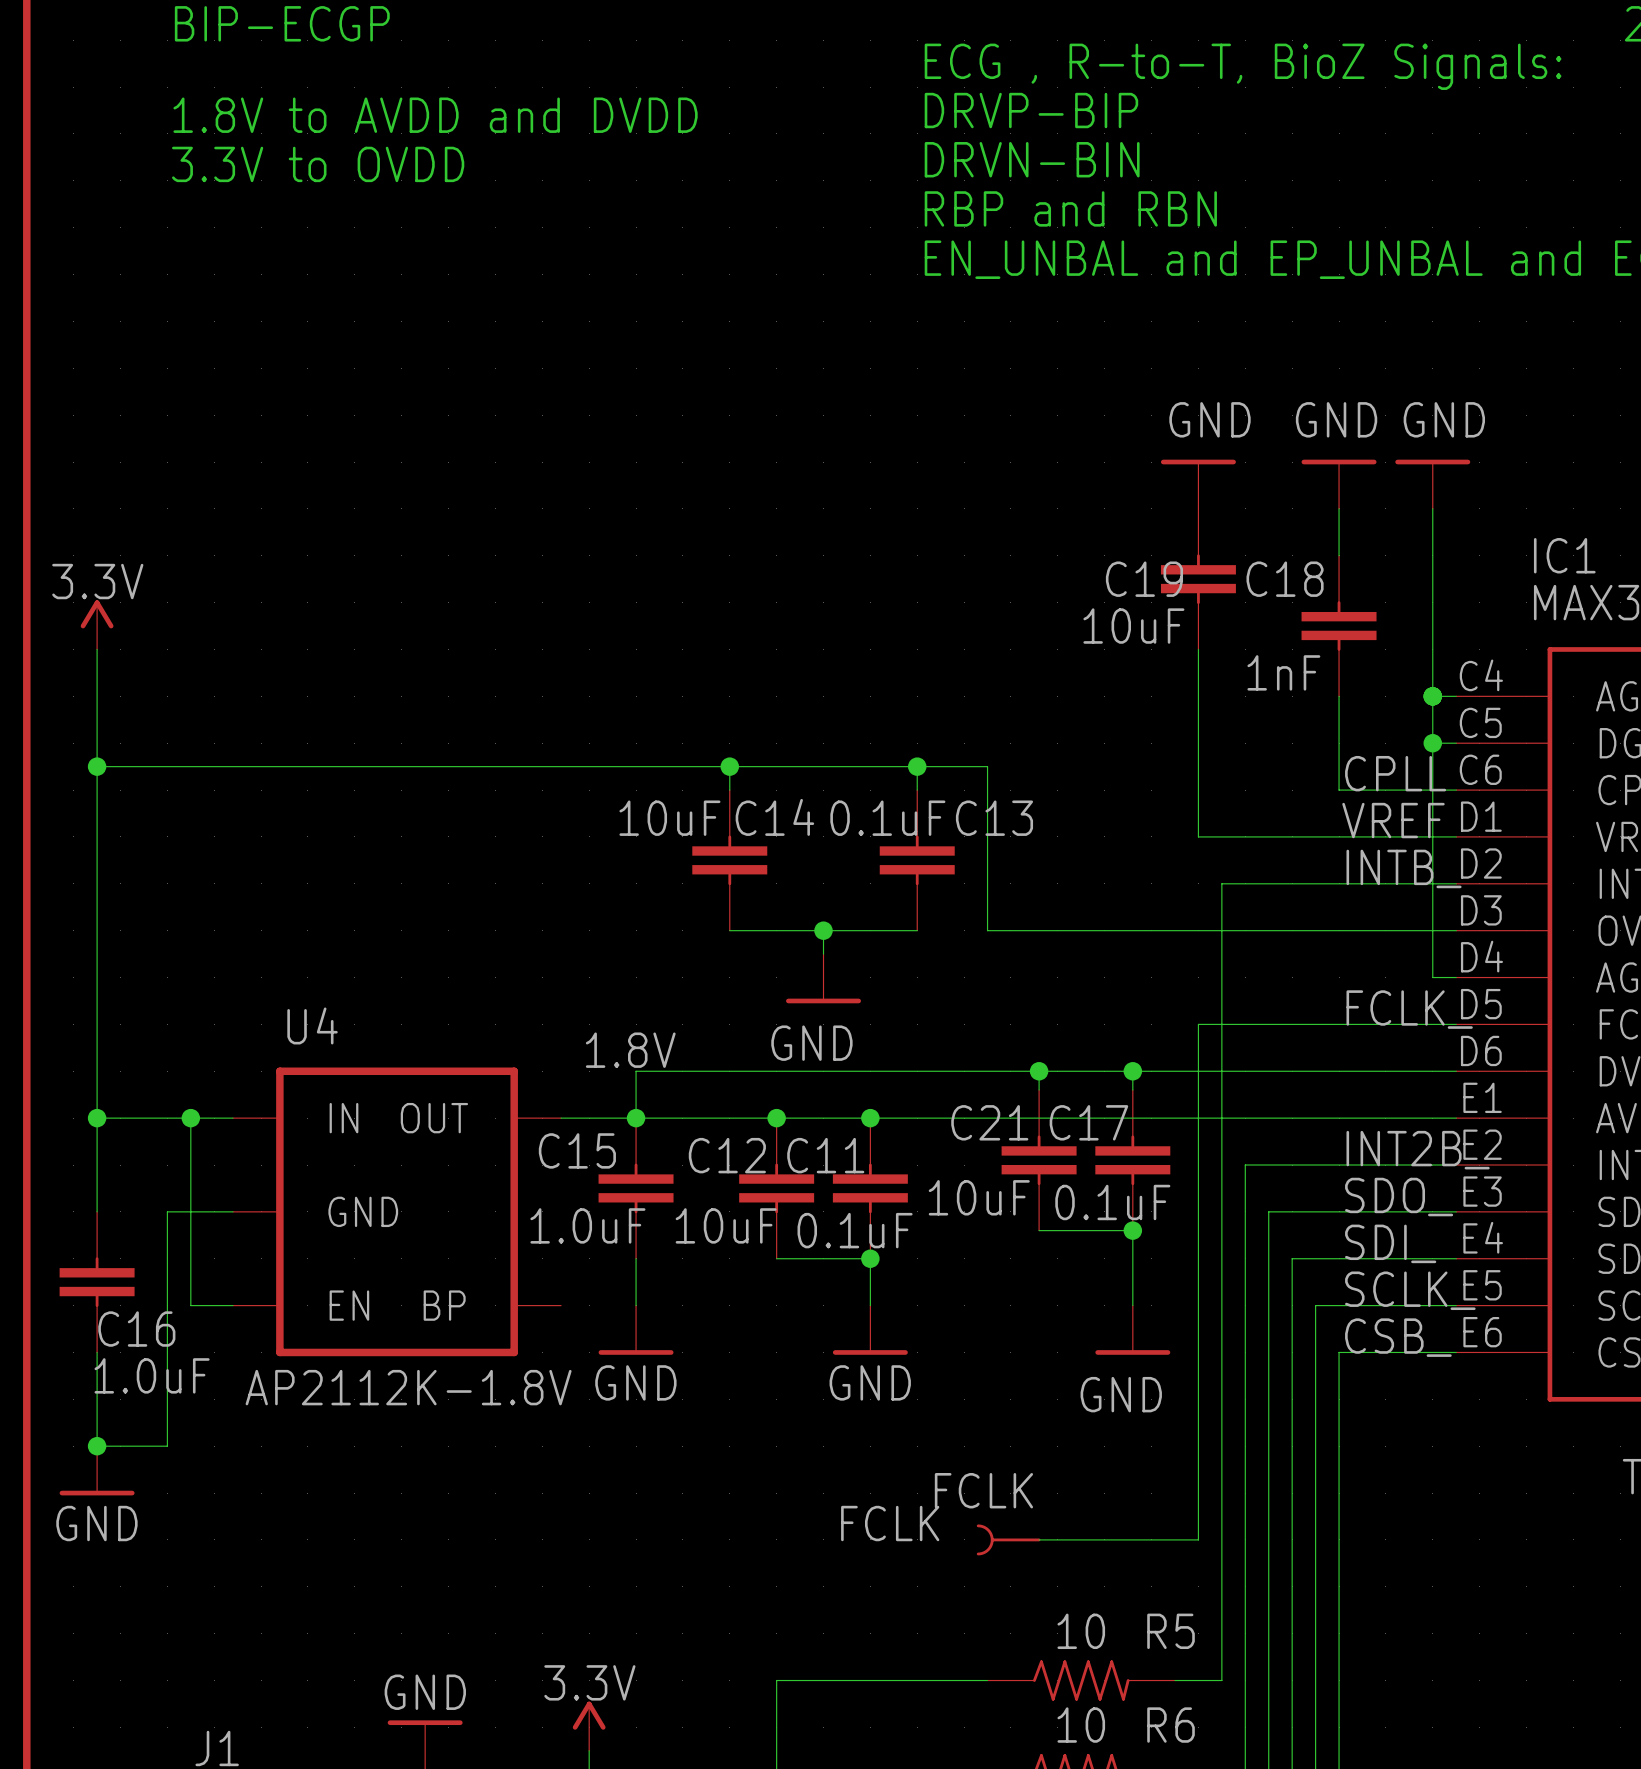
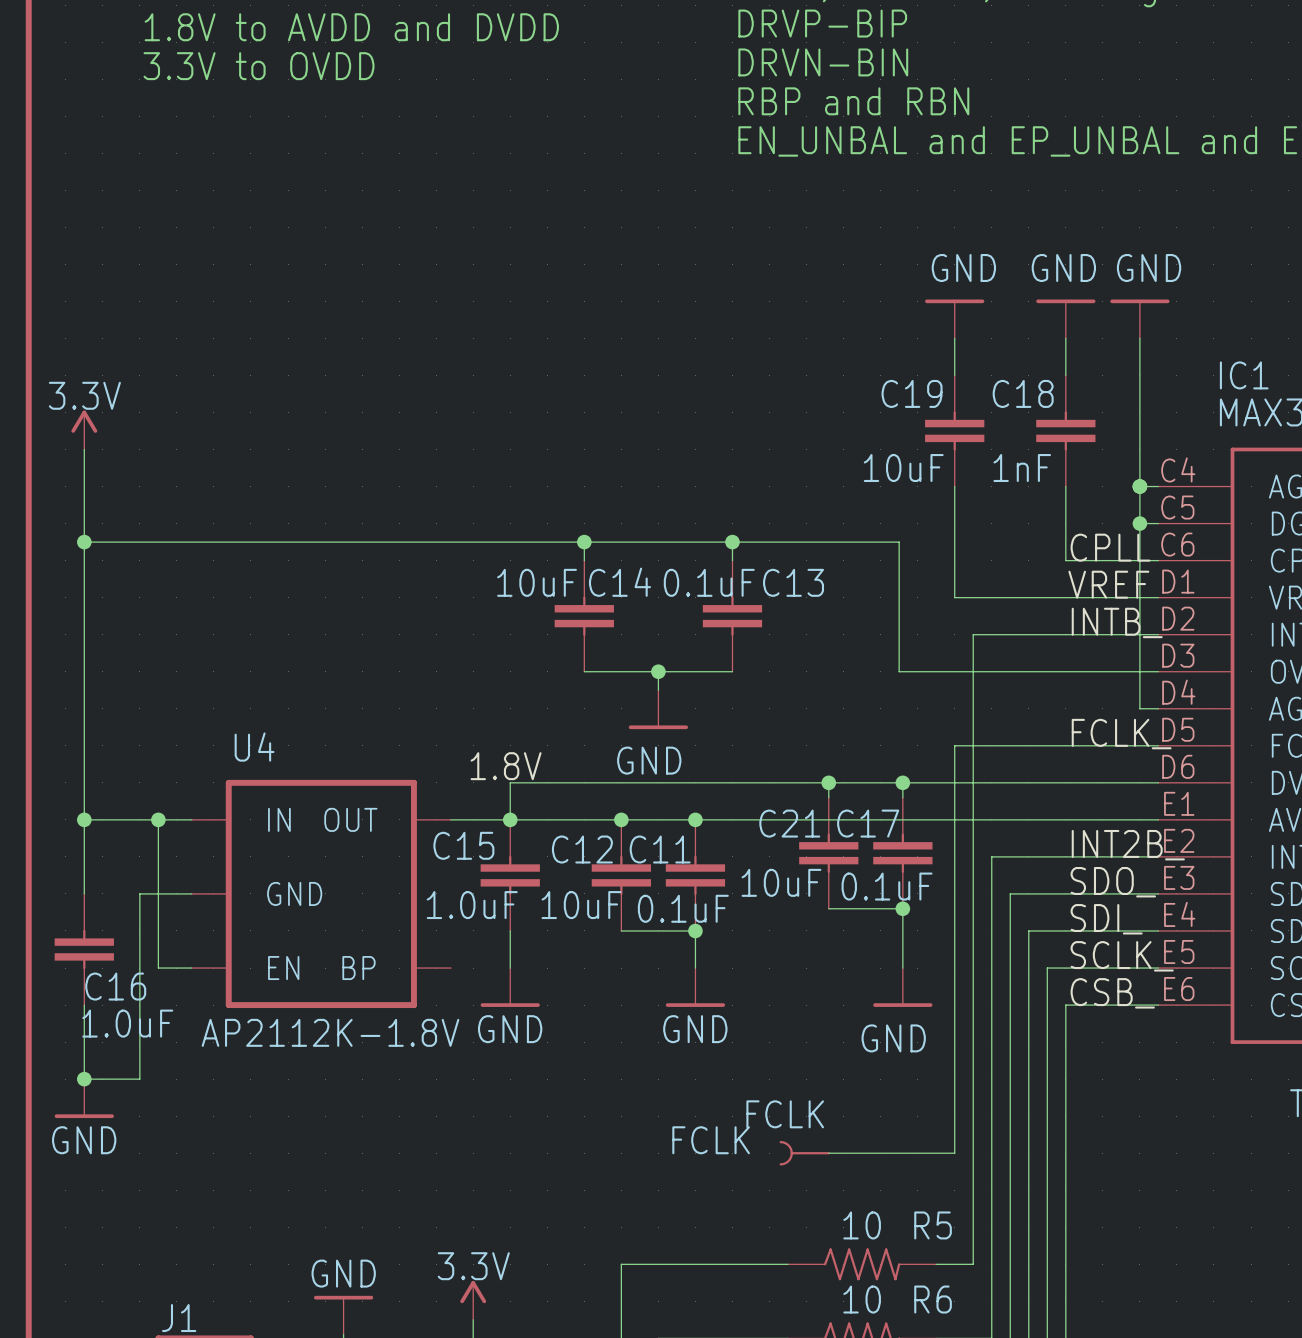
C19 position: (1198, 579) -> (954, 430)
wire: (987, 766) (987, 930) (1128, 930) -> (788, 542) (899, 542) (899, 671)

